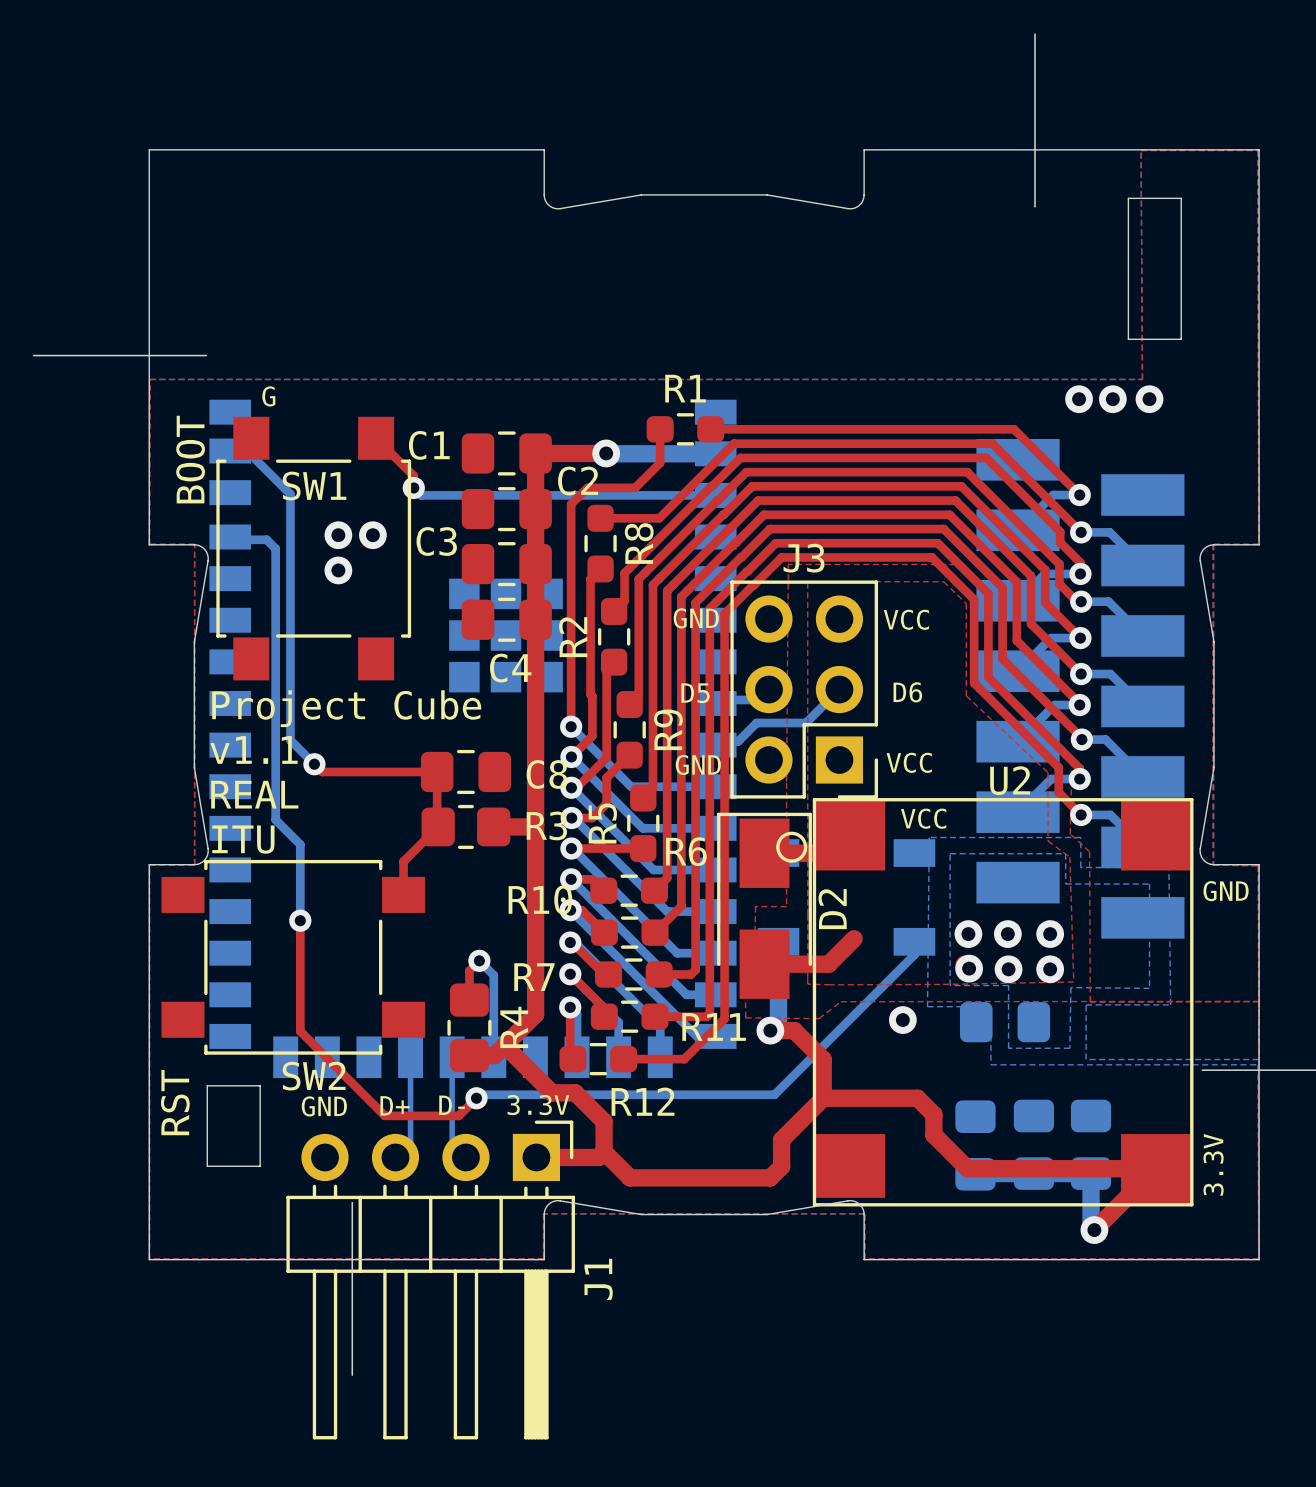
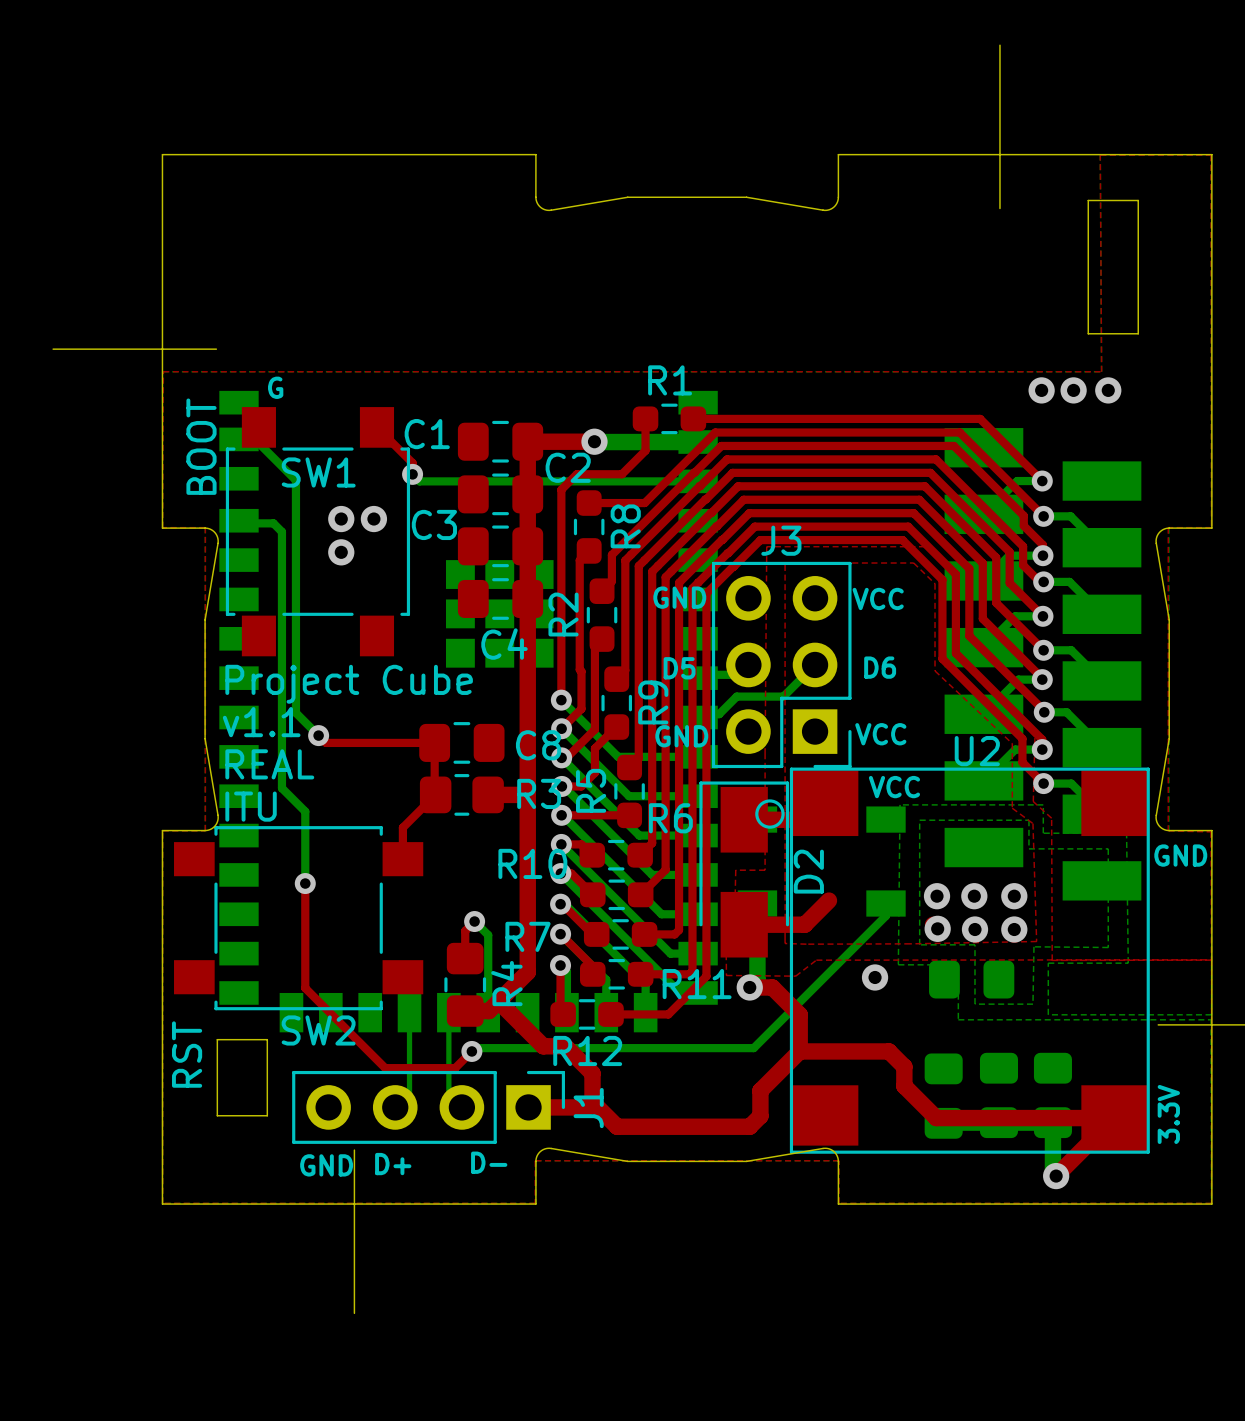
R12 name position: R12 (642, 1101) -> R12 (587, 1050)
text position: D+ (395, 1105) -> D+ (393, 1164)
text position: D- (452, 1105) -> D- (489, 1162)
text: 3.3V (538, 1105) -> none
text position: GND (324, 1106) -> GND (326, 1165)
J1 footprint: [286, 1120, 575, 1440] -> [292, 1070, 565, 1144]

